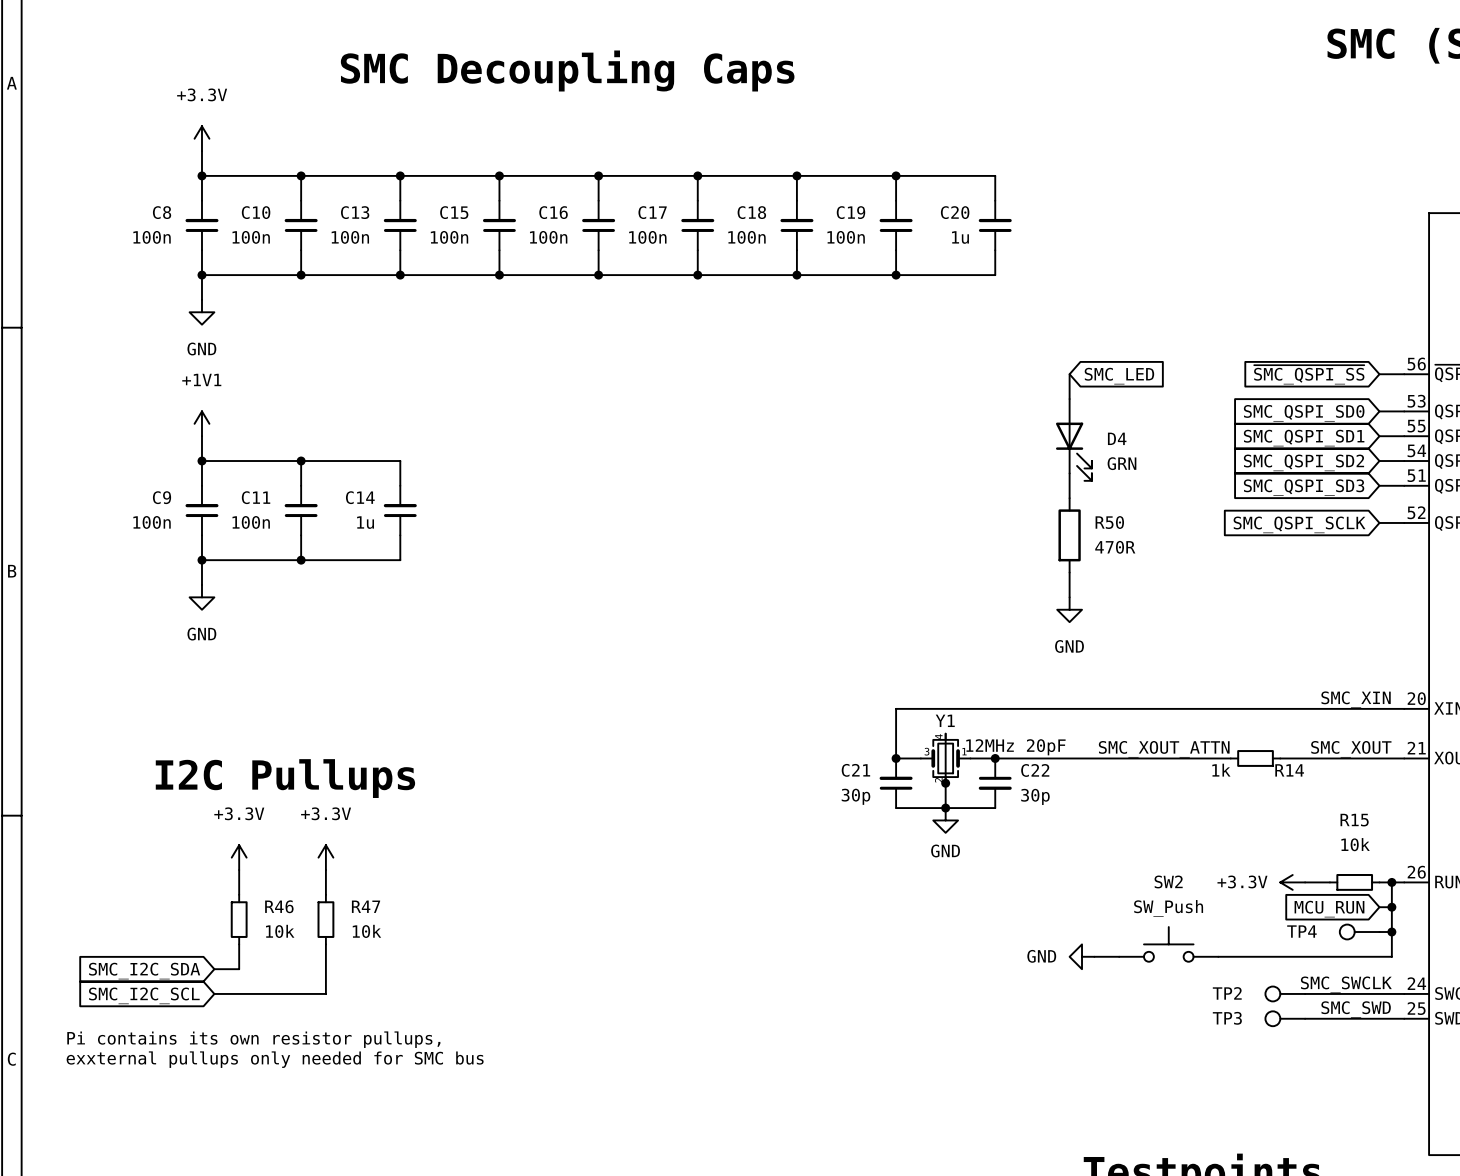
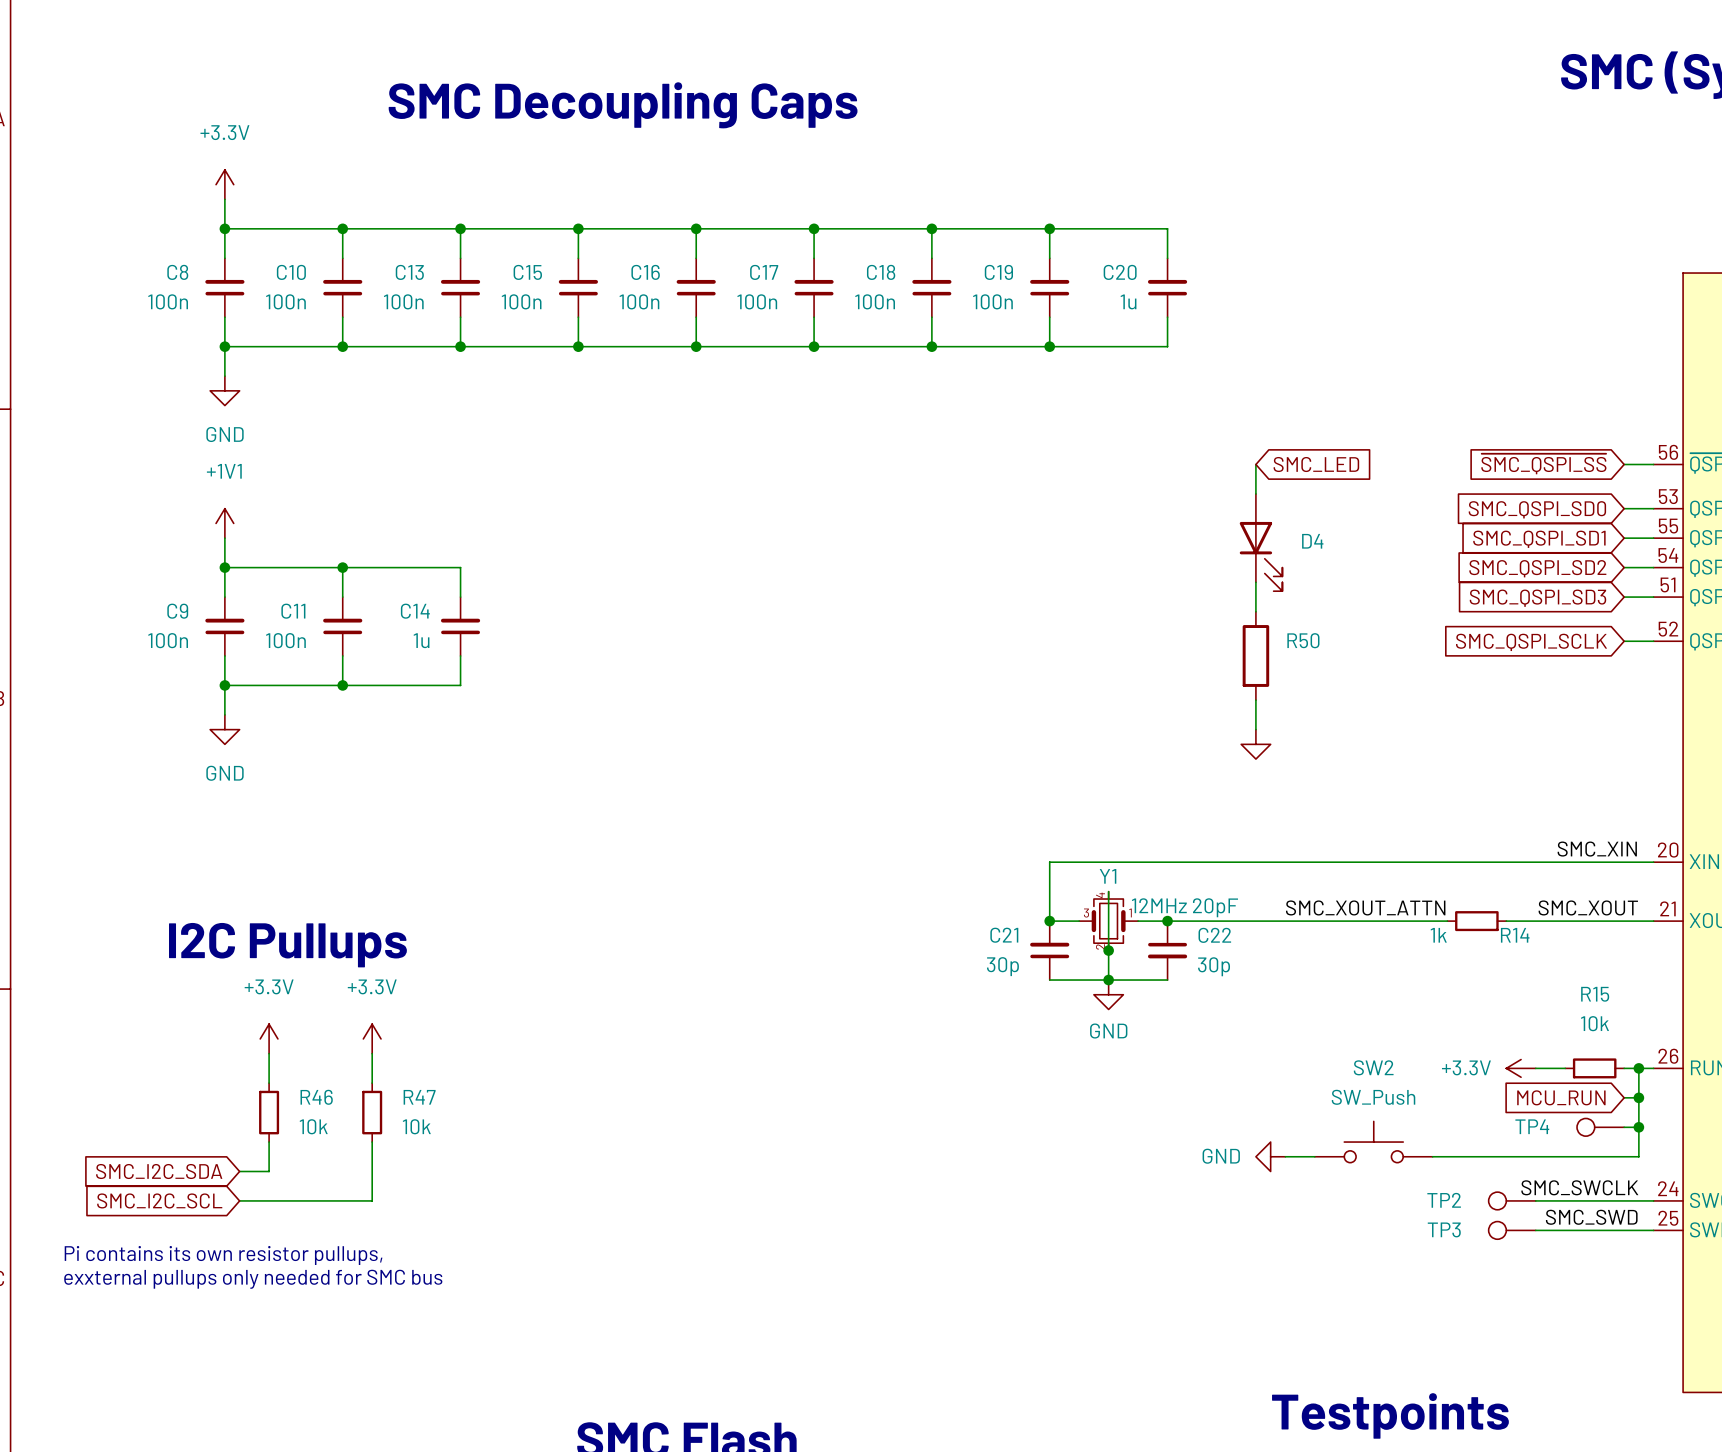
D4 value: GRN (1121, 463) -> none
R50 value: 470R (1115, 547) -> none
power symbol text: GND (1069, 646) -> none

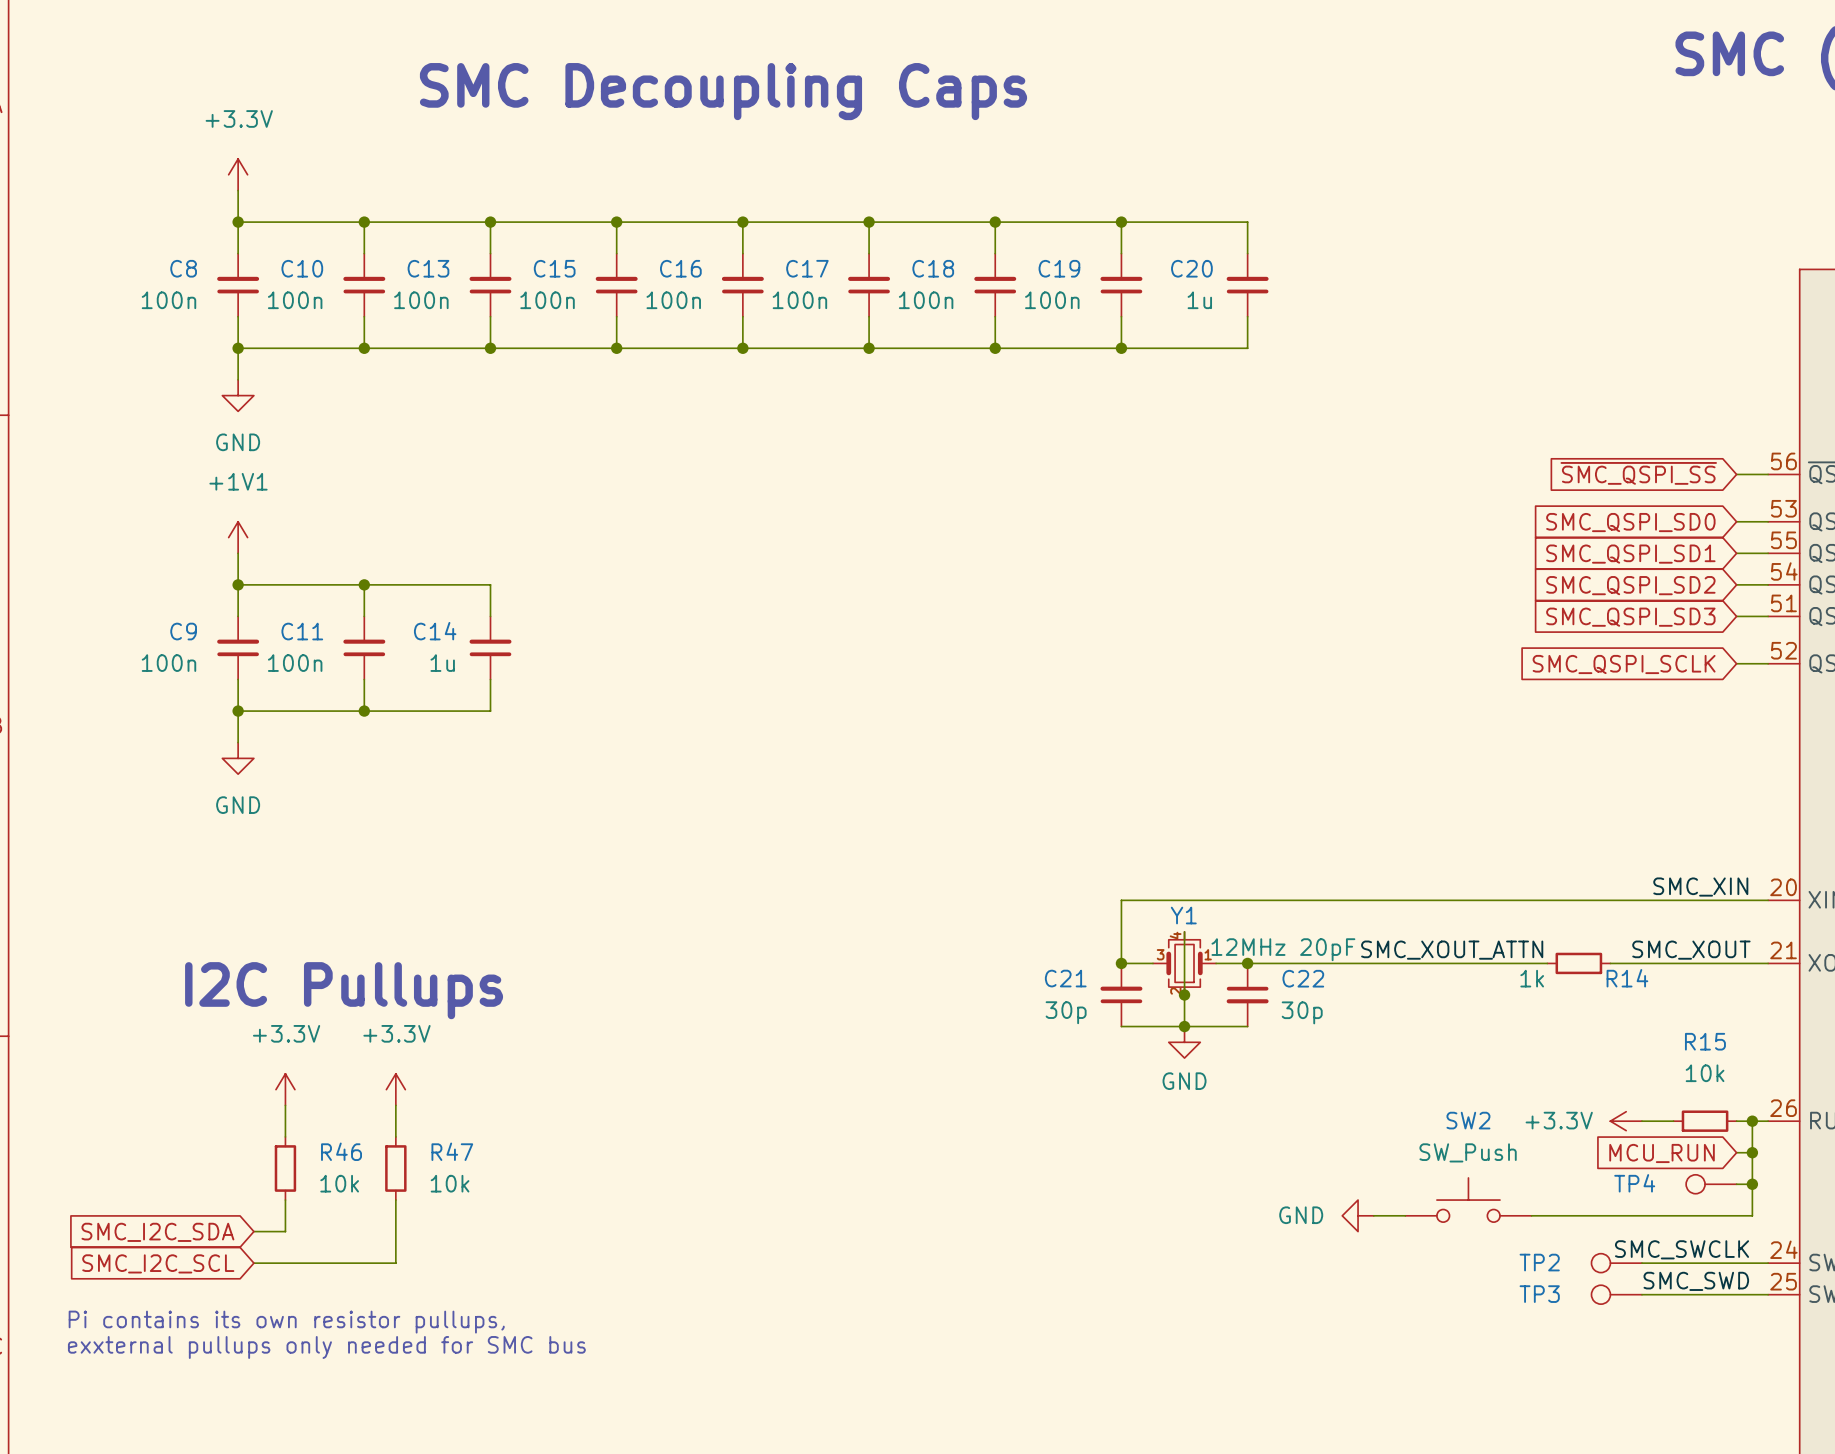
wire: (1255, 464) (1255, 493) -> none
global label: SMC_LED (1316, 464) -> none
D4: (1261, 542) -> none
wire: (1255, 582) (1255, 611) -> none
R50: (1255, 655) -> none
wire: (1255, 700) (1255, 729) -> none
power symbol: (1255, 744) -> none

